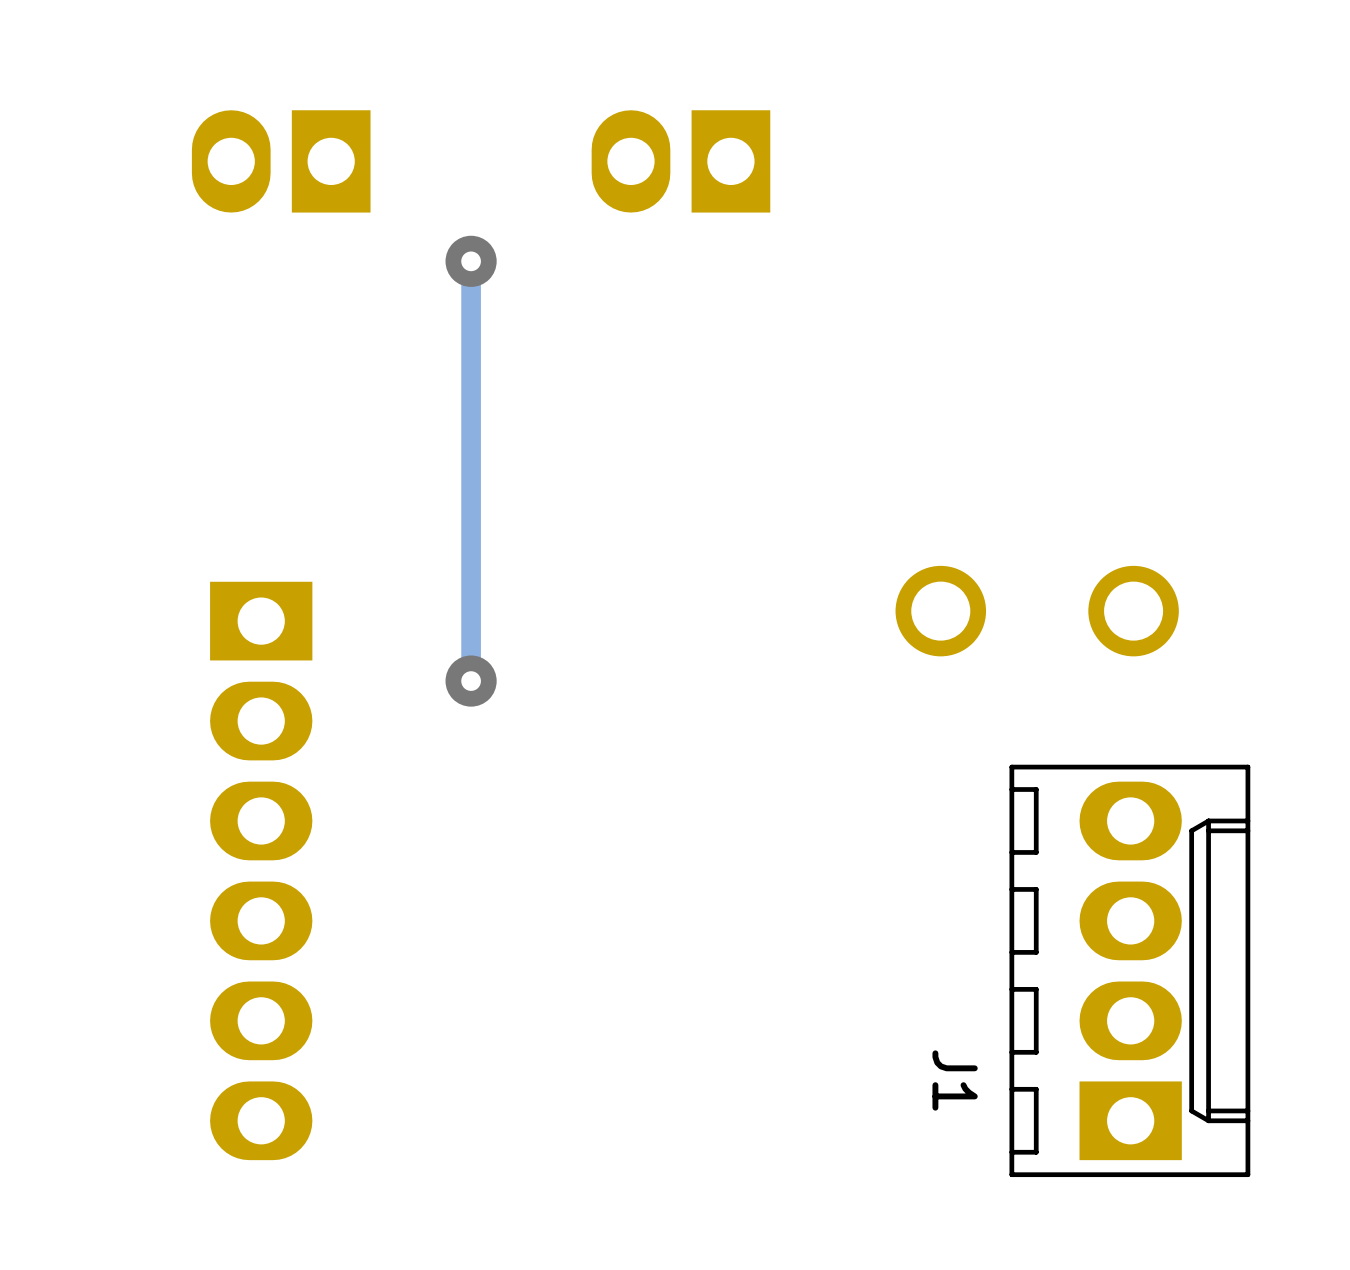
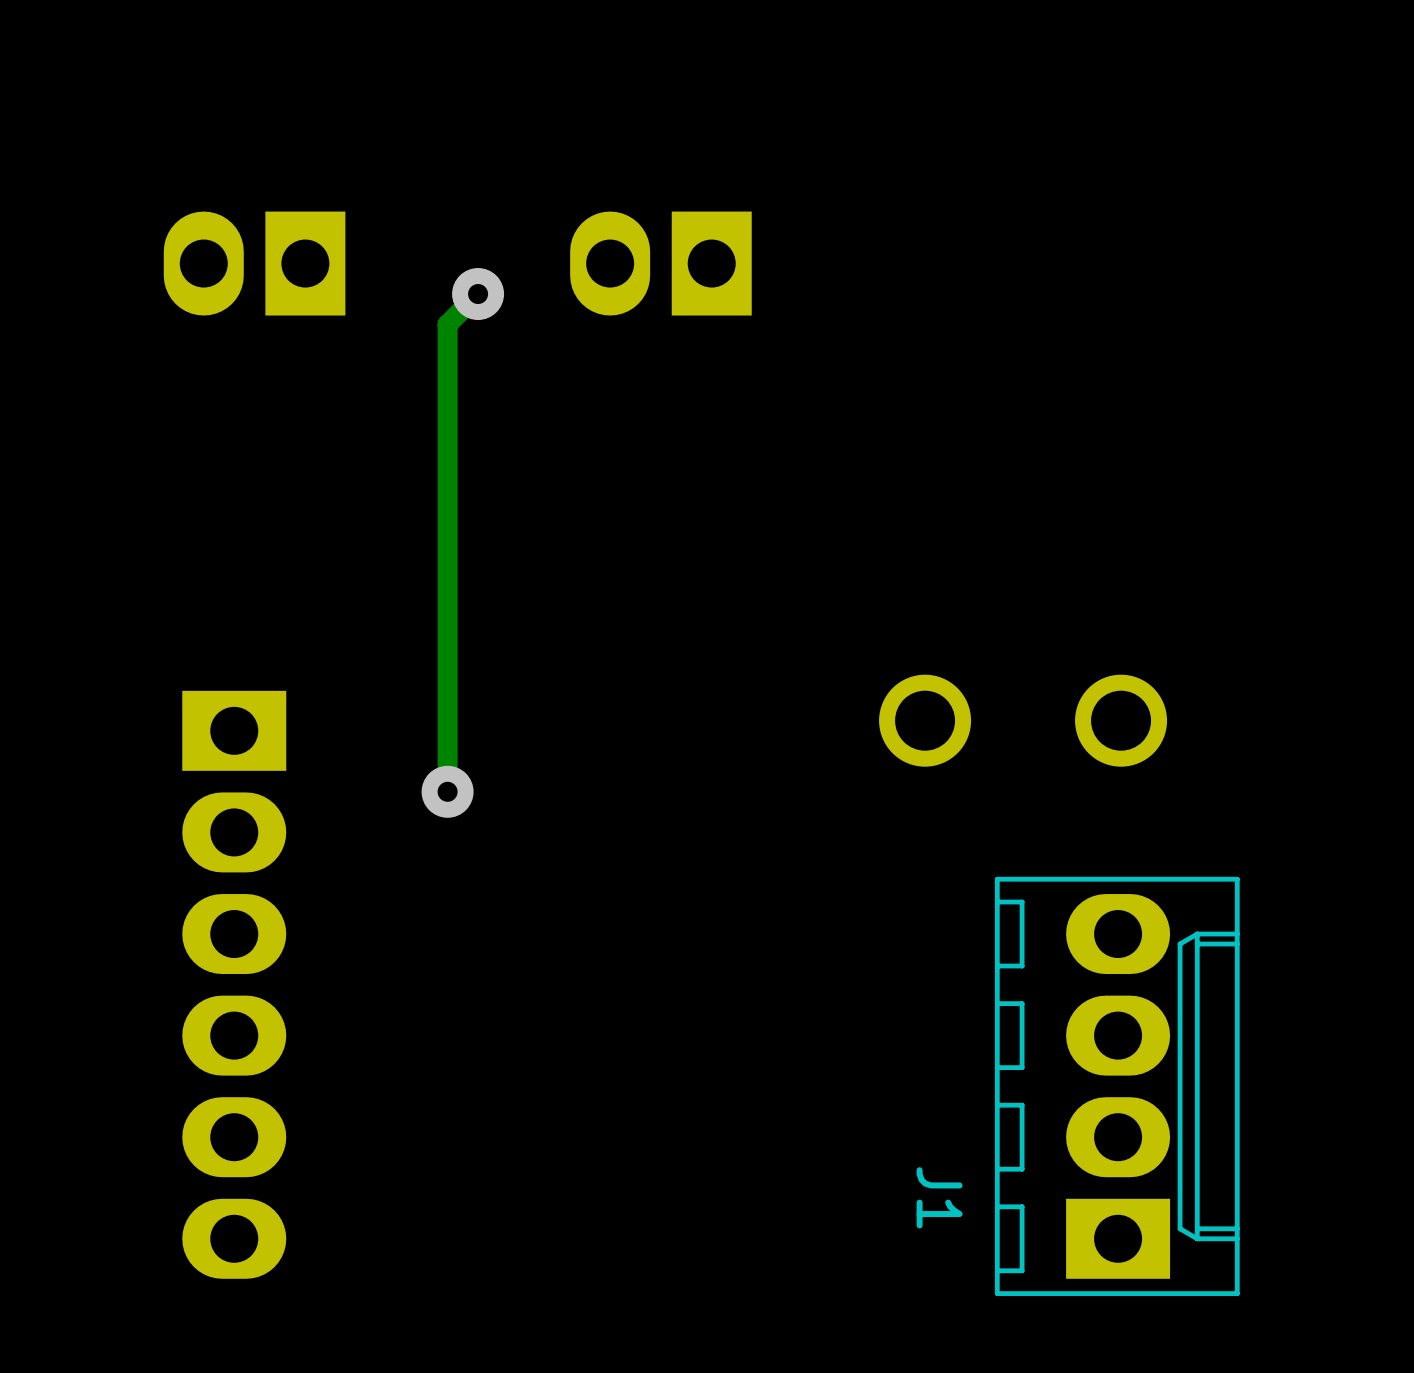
track: none -> (478, 294) (447, 324) (447, 365)
via position: (471, 261) -> (478, 294)

